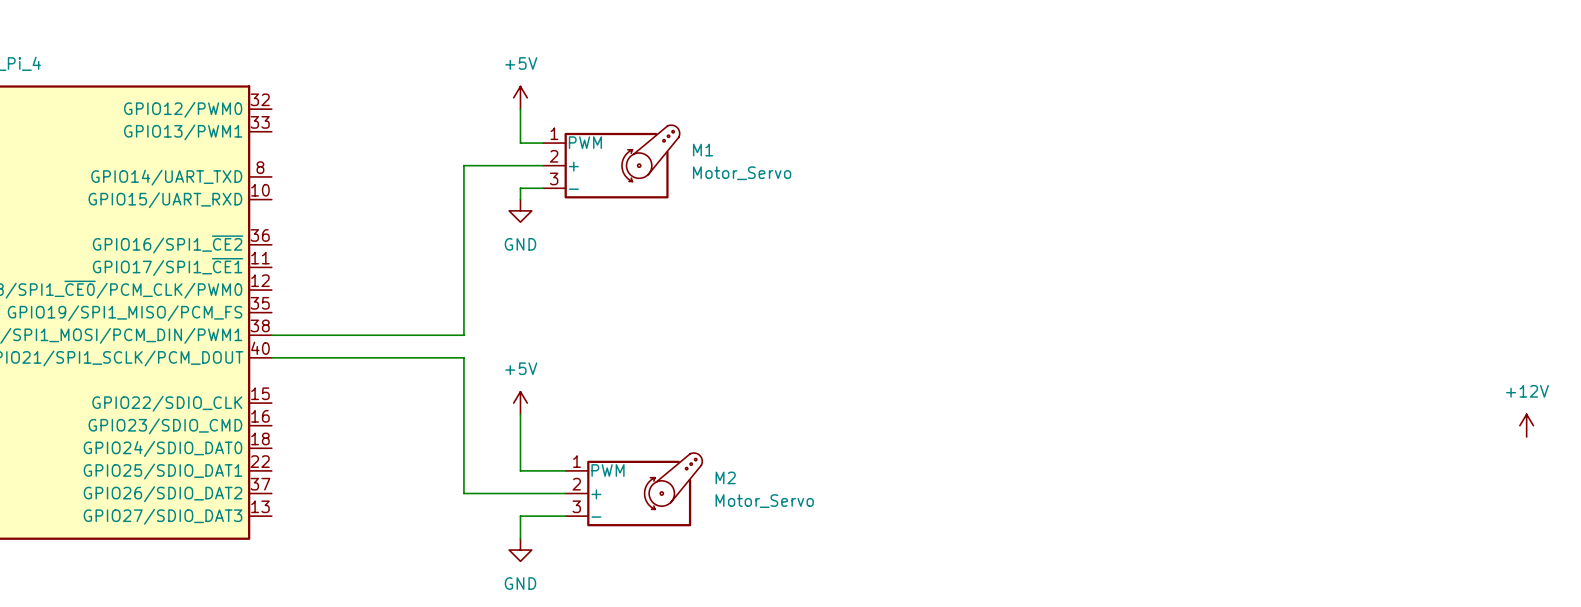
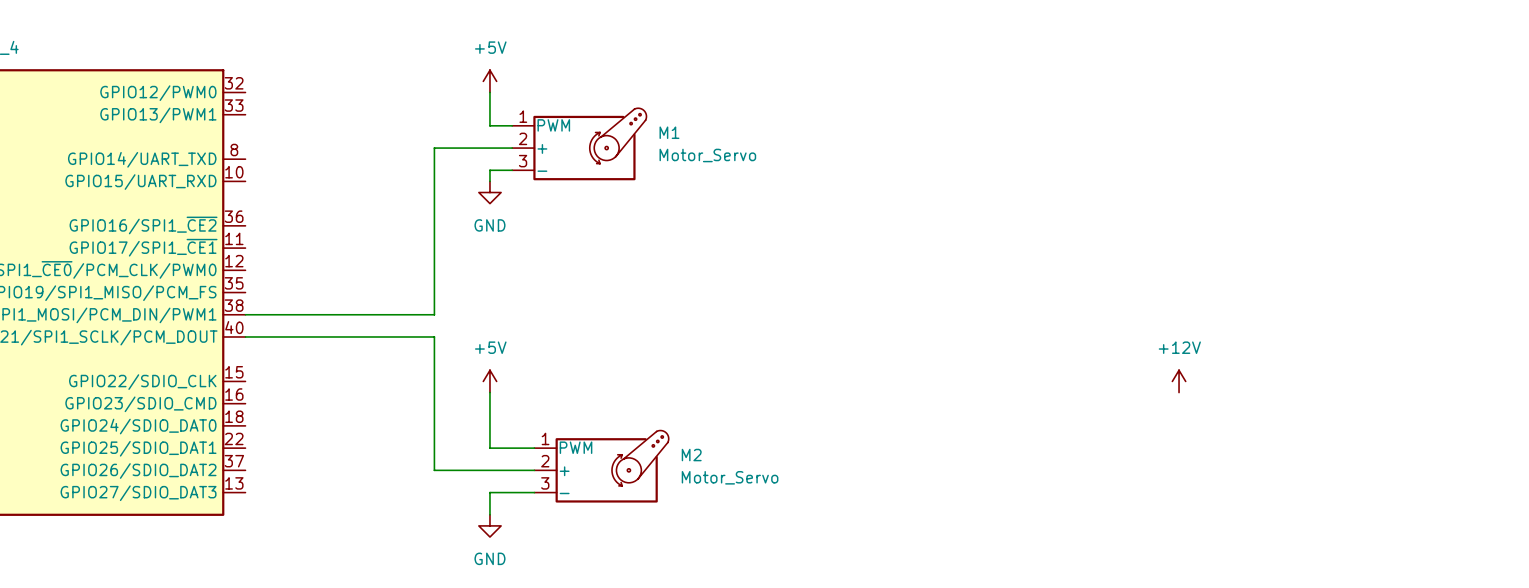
power symbol: none -> +12V (1179, 381)
power symbol: +12V (1526, 425) -> none

